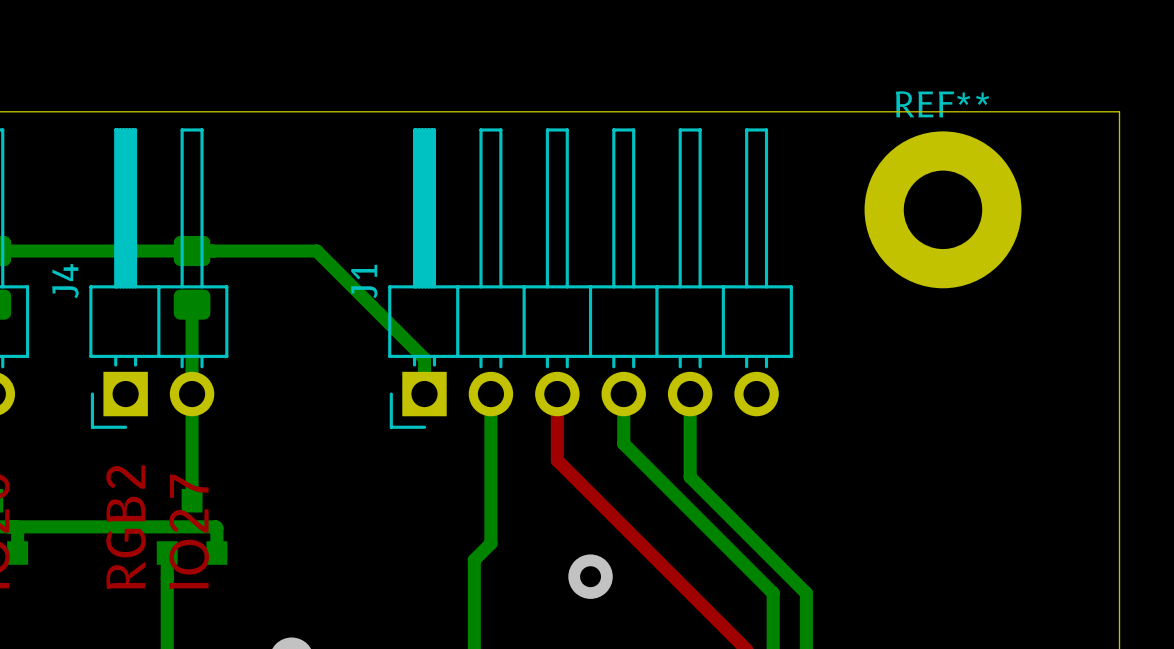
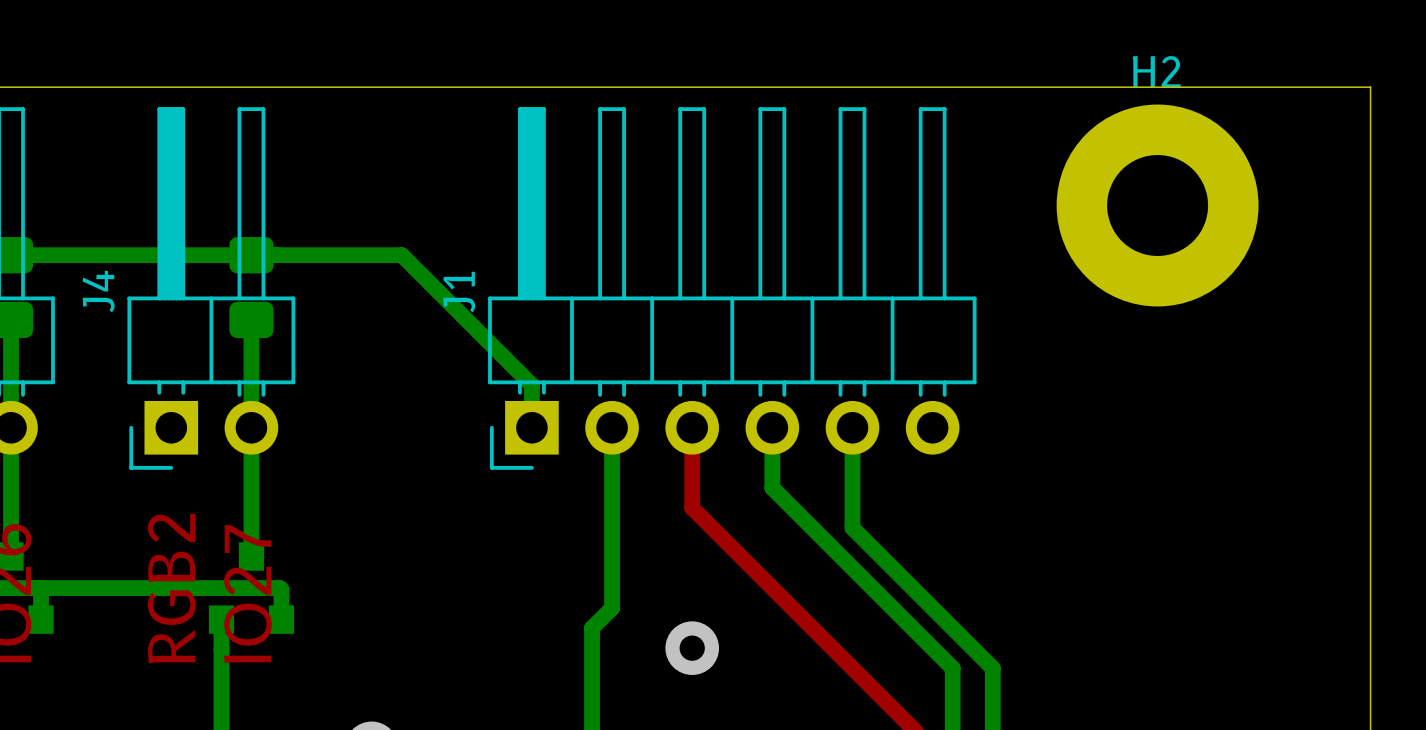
REF**: (943, 209) -> none
H2: none -> (1157, 205)
via position: (590, 576) -> (692, 648)

